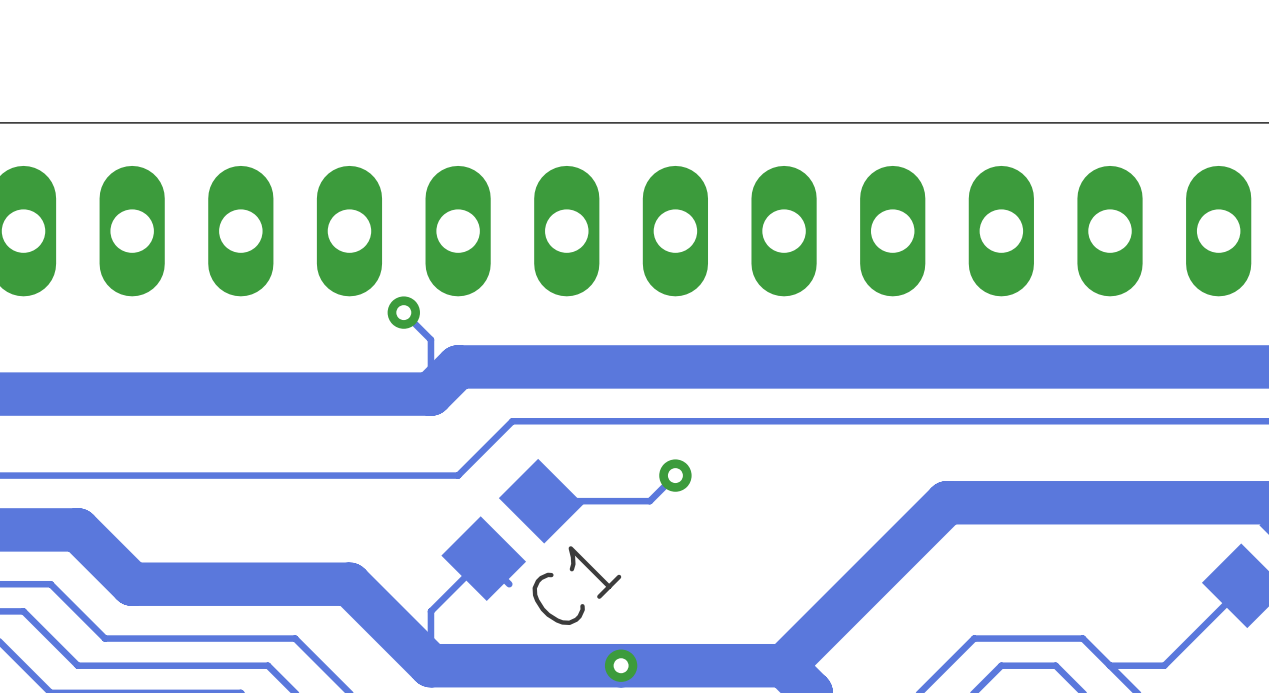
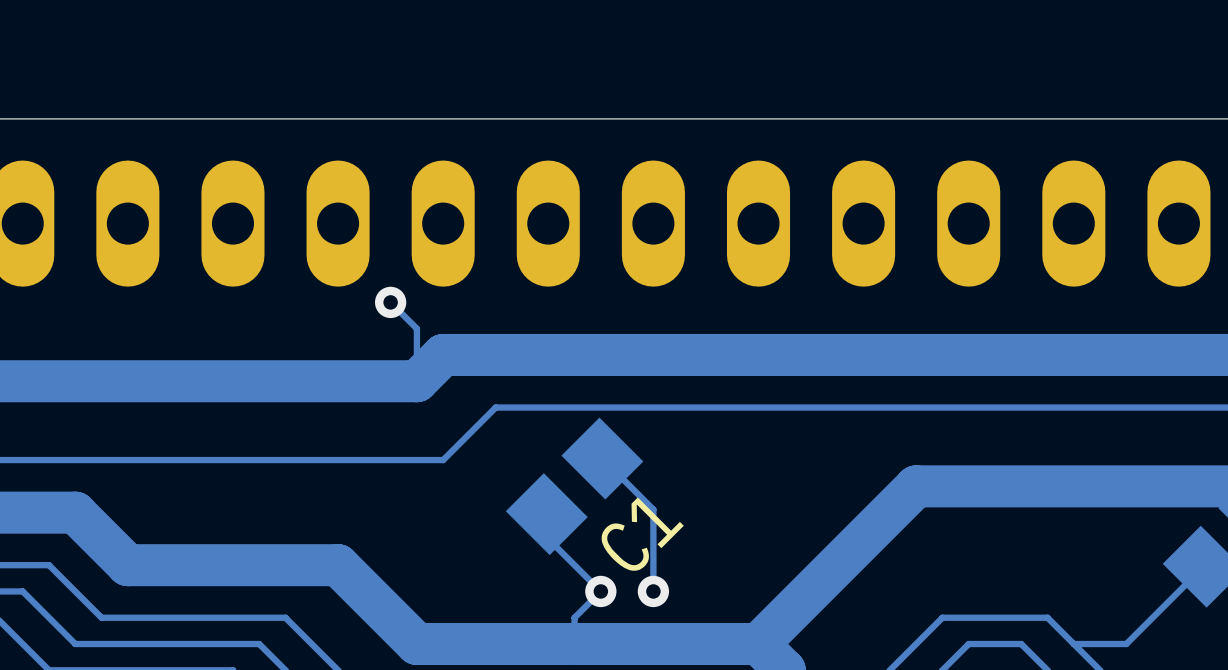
track: none -> (602, 458) (653, 509) (653, 591)
track: (675, 475) (649, 501) (541, 501) -> none
via: (675, 475) -> none
C1 position: (512, 529) -> (574, 486)
track: none -> (546, 514) (546, 537) (600, 591) (574, 617) (574, 644)
track: (509, 584) (483, 558) (430, 611) (430, 665) -> none
via: none -> (600, 591)
via: none -> (653, 591)
via: (621, 665) -> none

